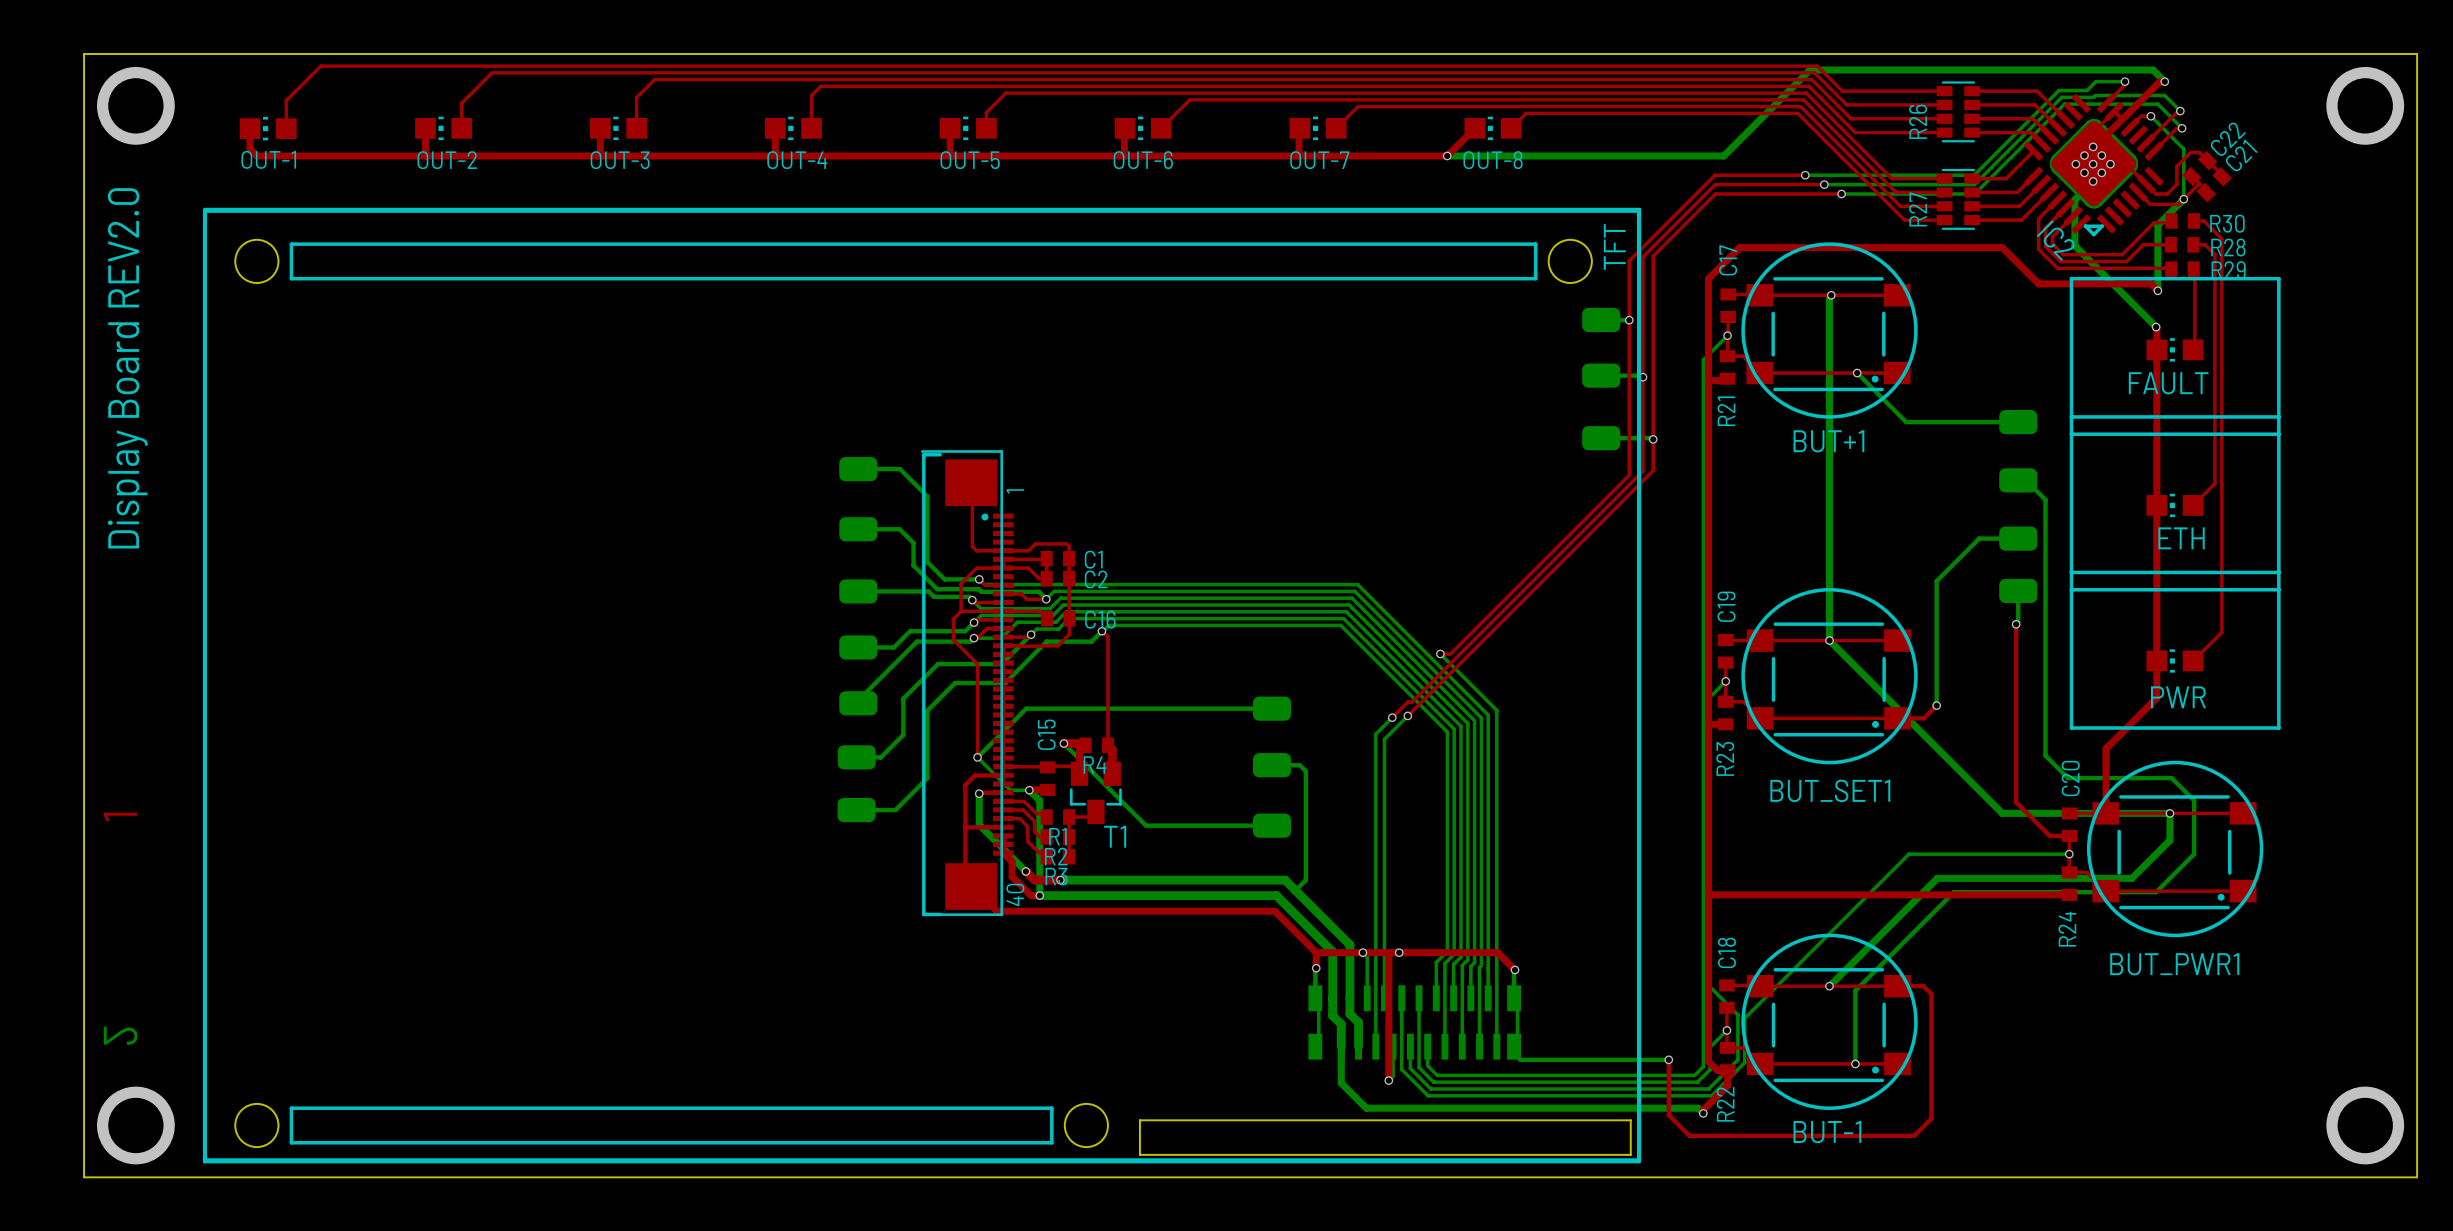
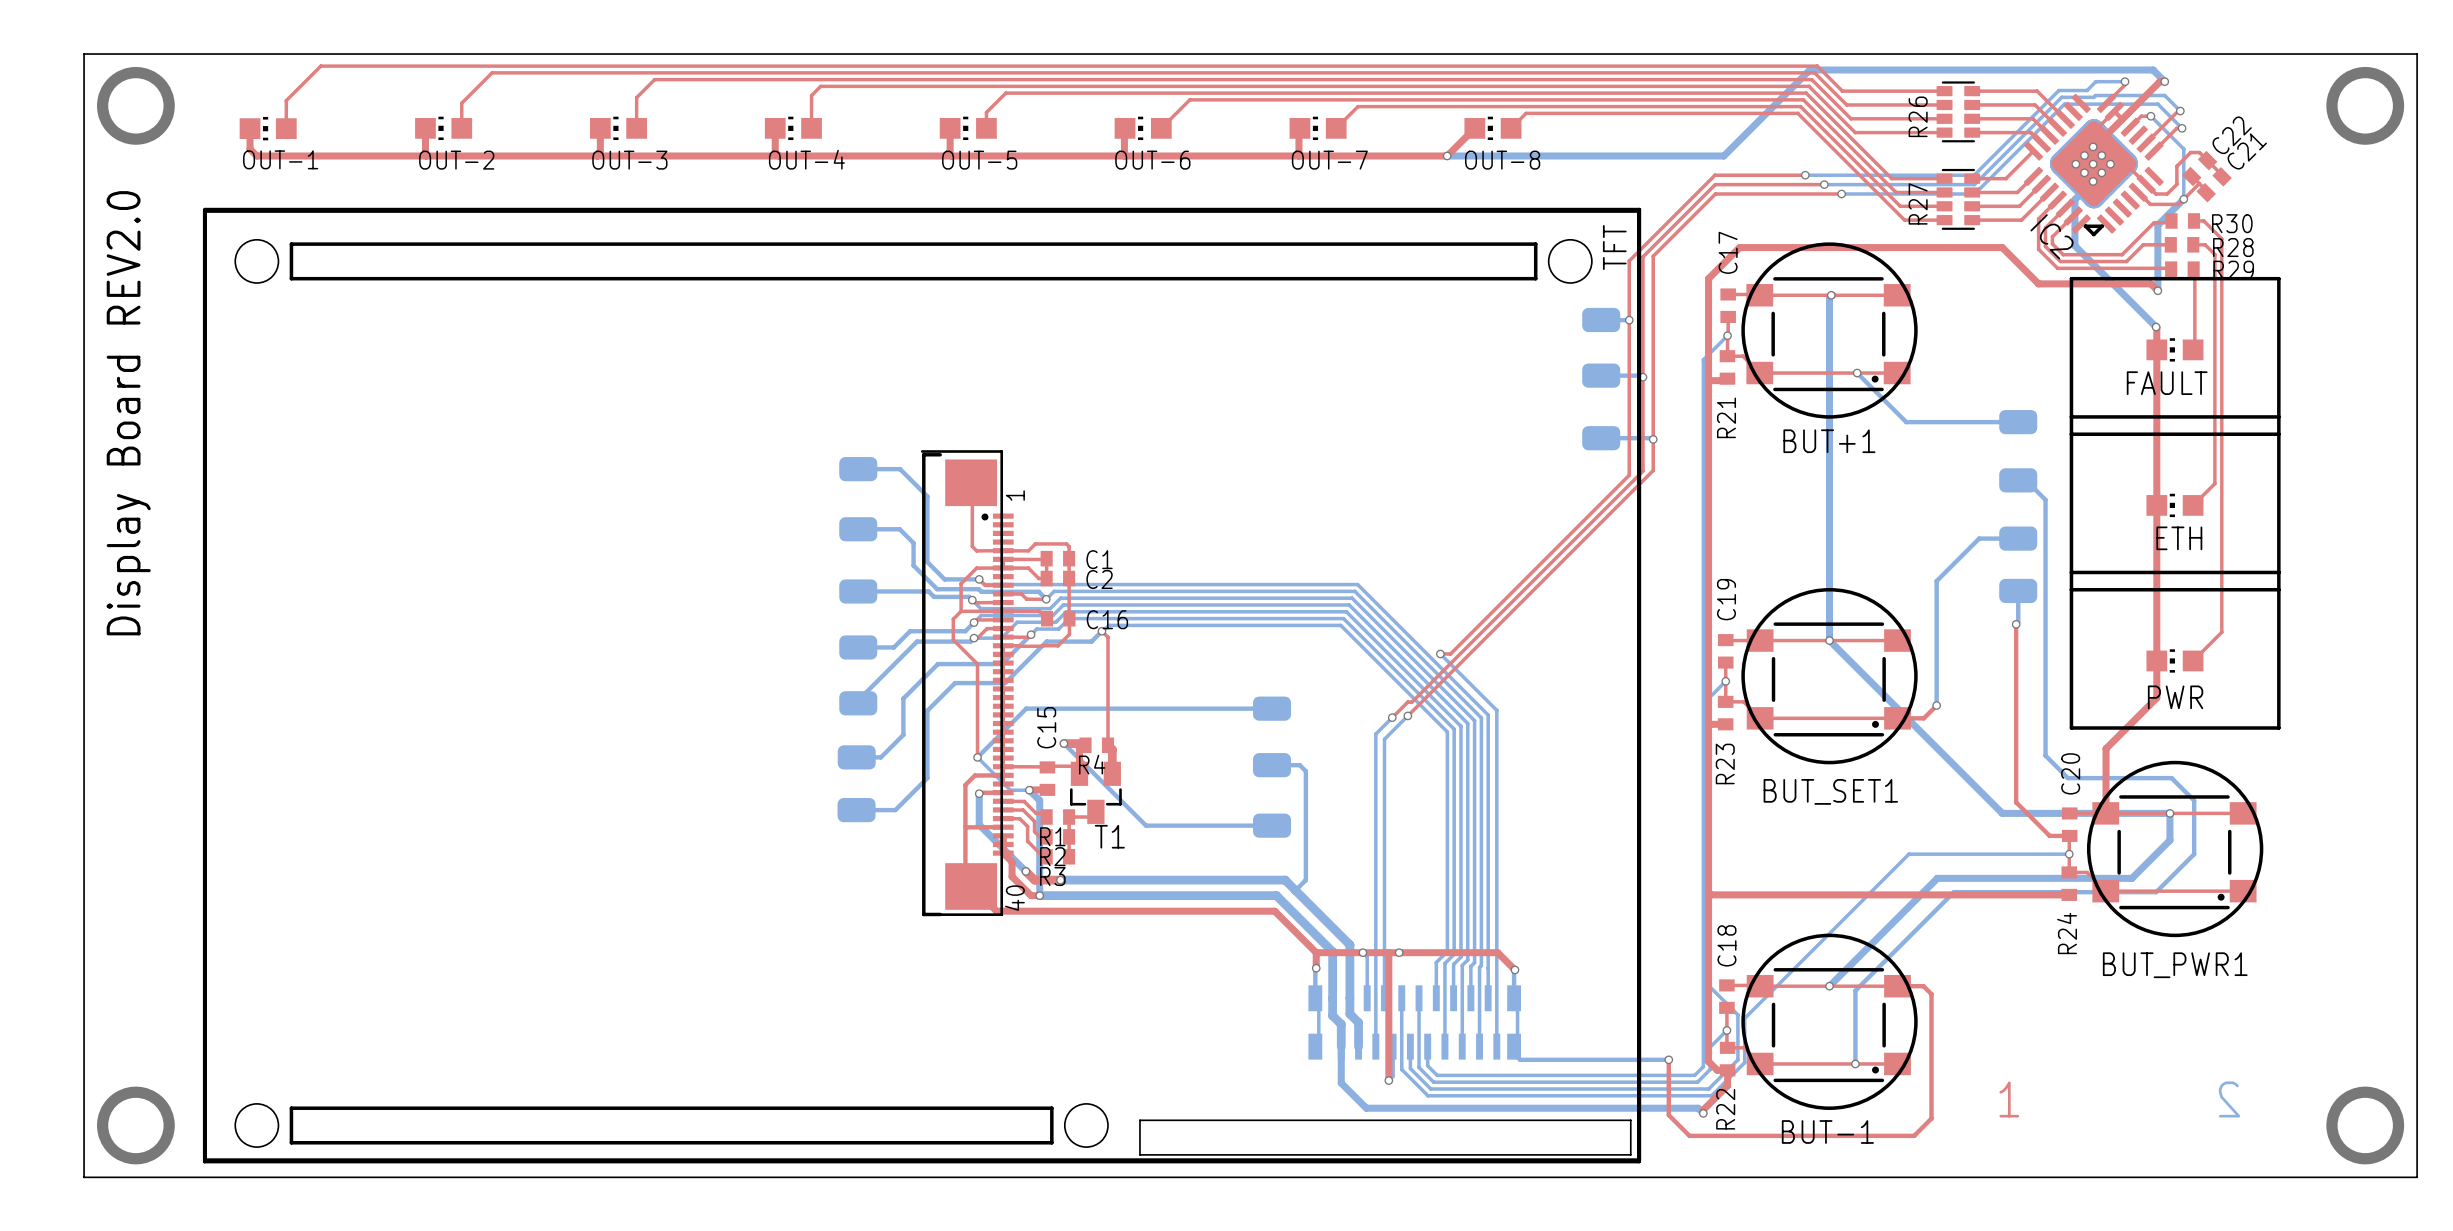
drawing: [103, 812, 138, 1045] -> none
drawing: none -> [1999, 1081, 2241, 1118]

